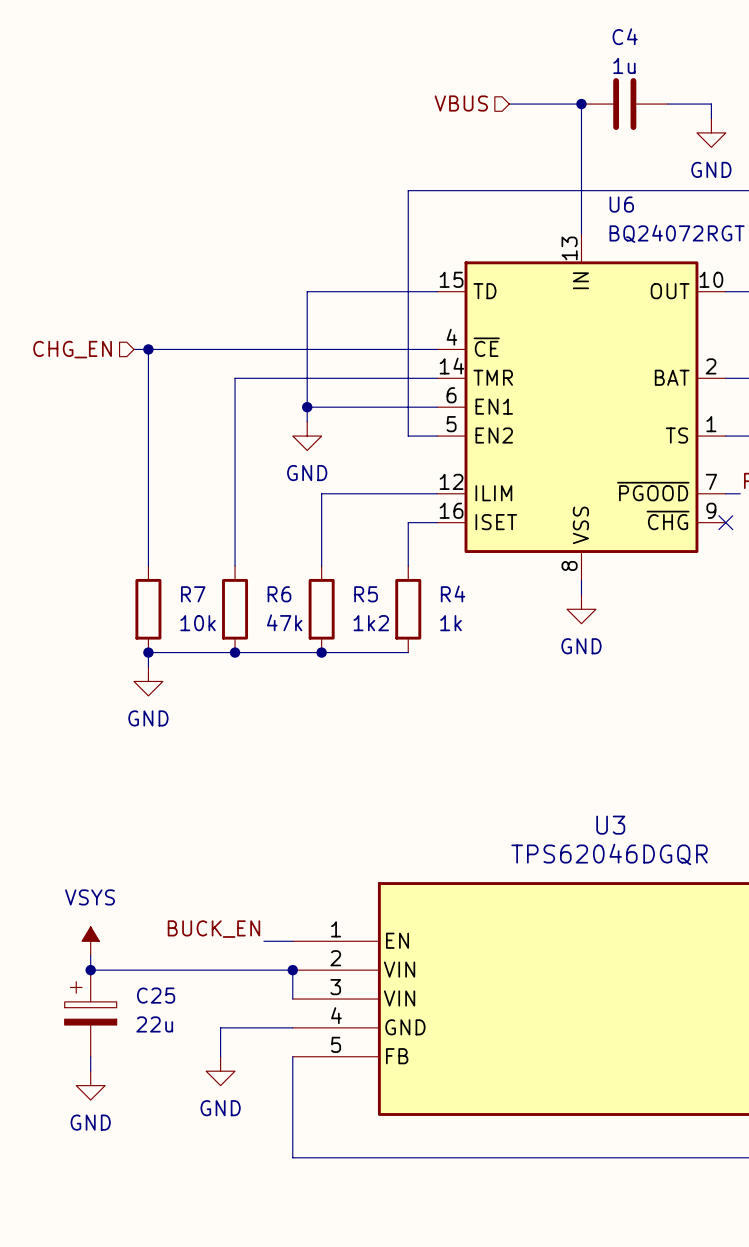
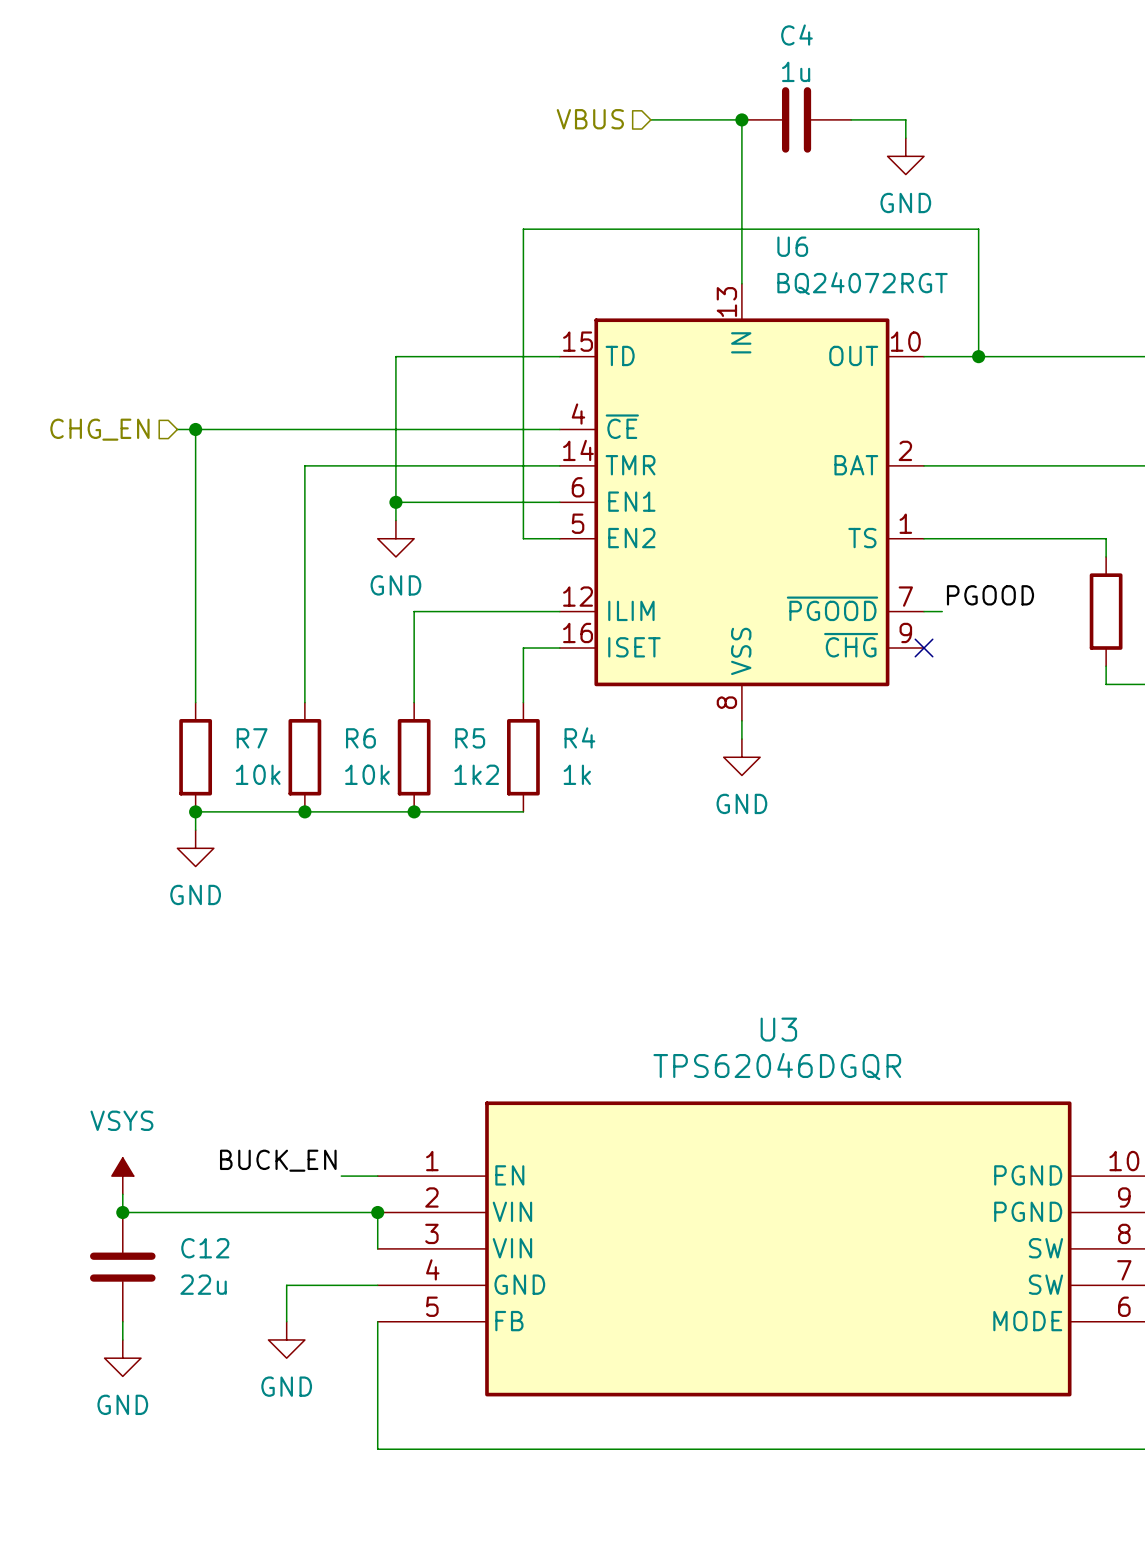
R6 value: 47k (284, 622) -> 10k (367, 774)
C25: 22u (90, 1013) -> none
C12: none -> 22u (122, 1267)

